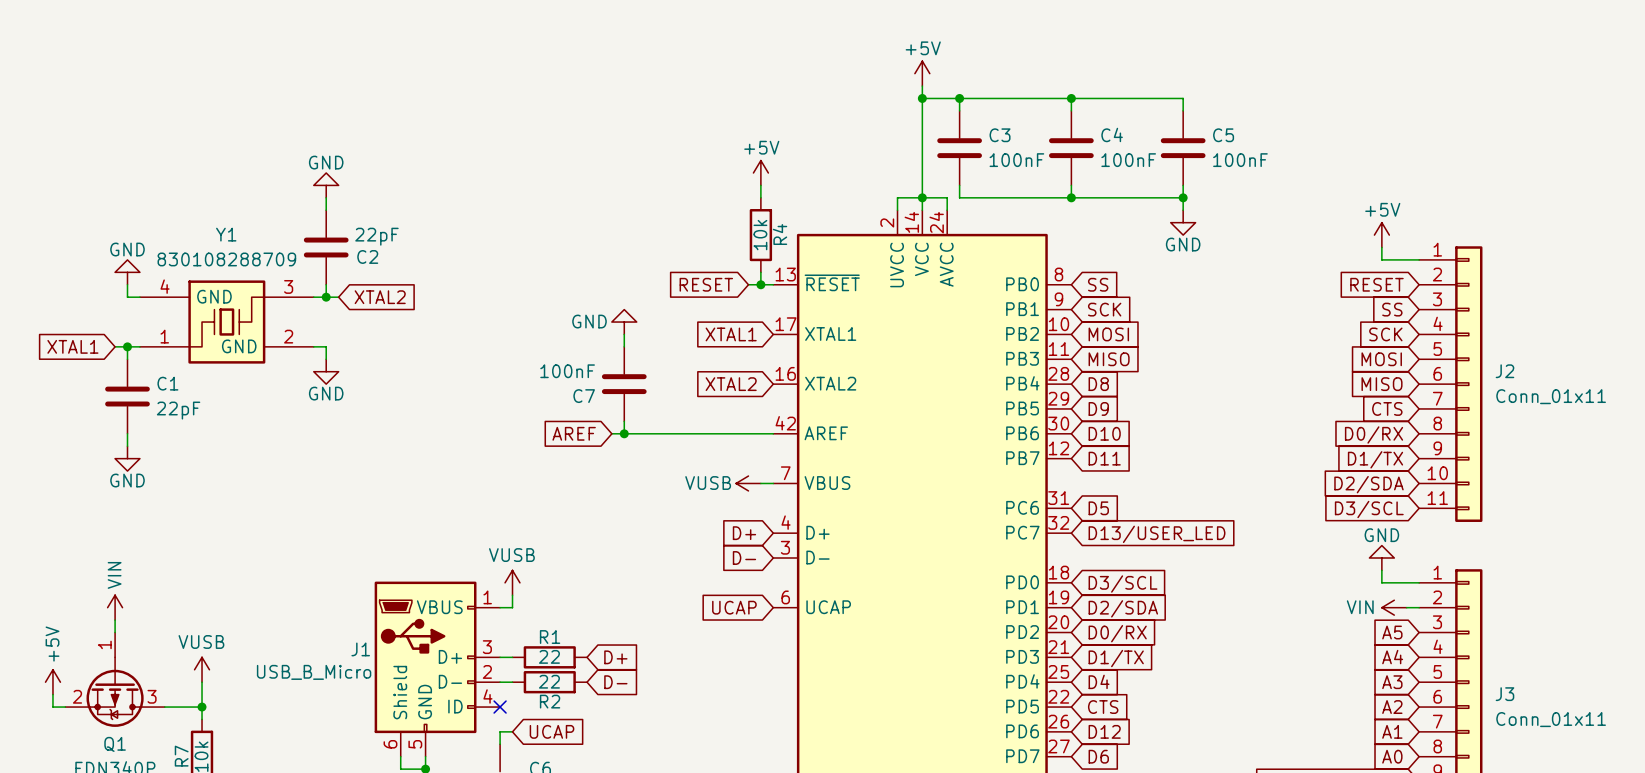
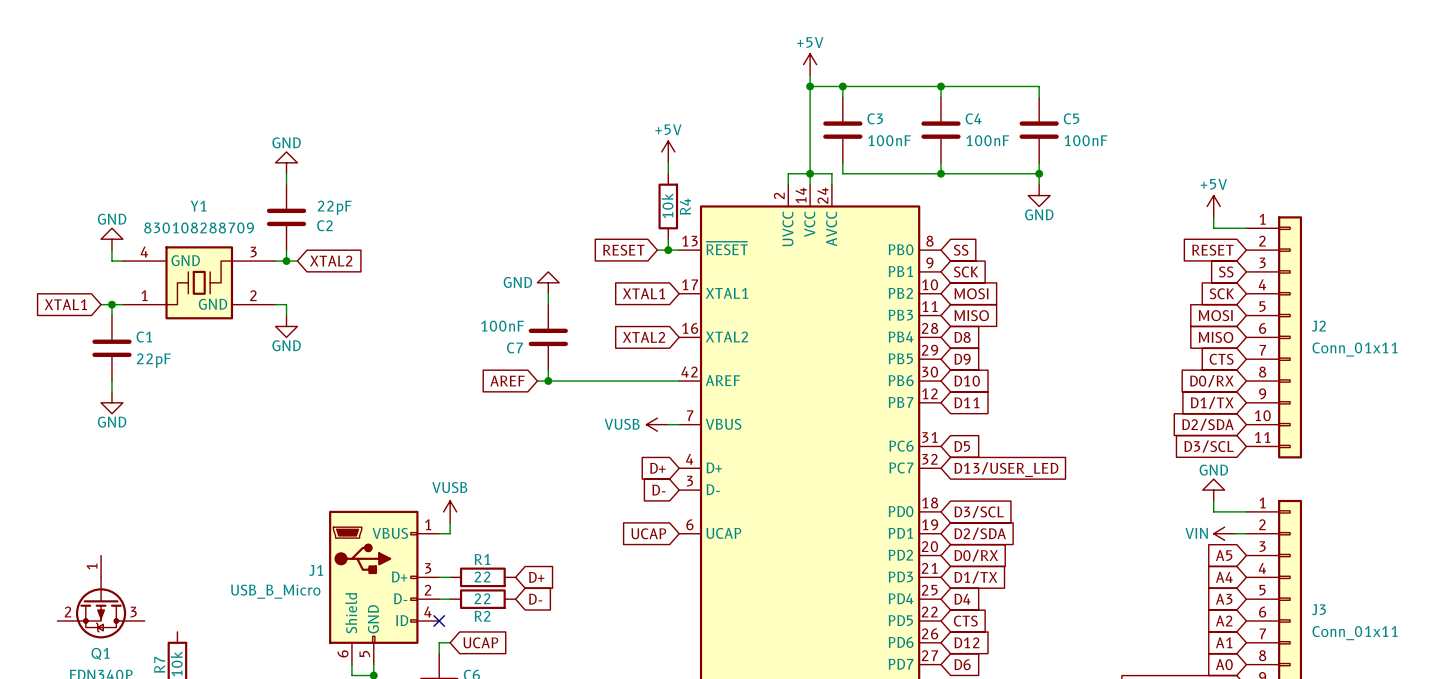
power symbol: VIN (115, 607) -> none
wire: (115, 620) (115, 632) -> none
power symbol: VUSB (202, 669) -> none
power symbol: +5V (52, 682) -> none
wire: (202, 682) (202, 719) -> none
wire: (52, 694) (52, 707) (65, 707) -> none
wire: (164, 707) (202, 707) -> none
junction: (202, 707) -> none

